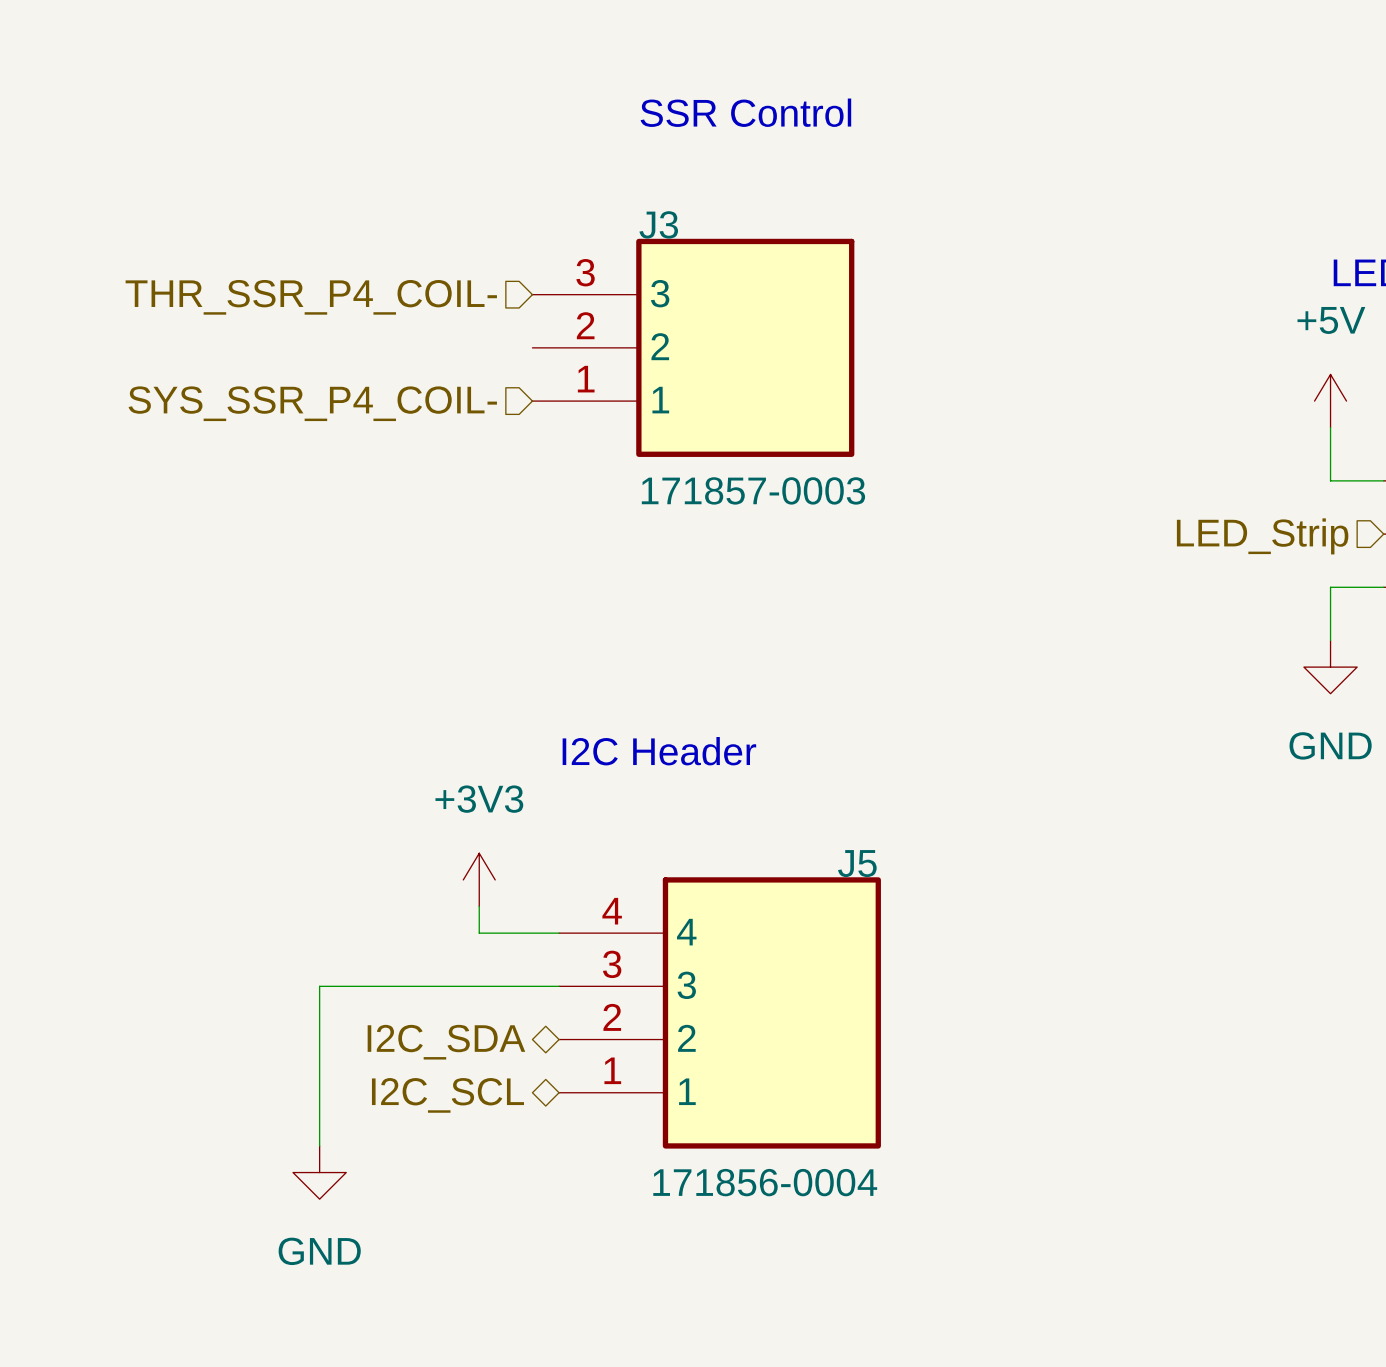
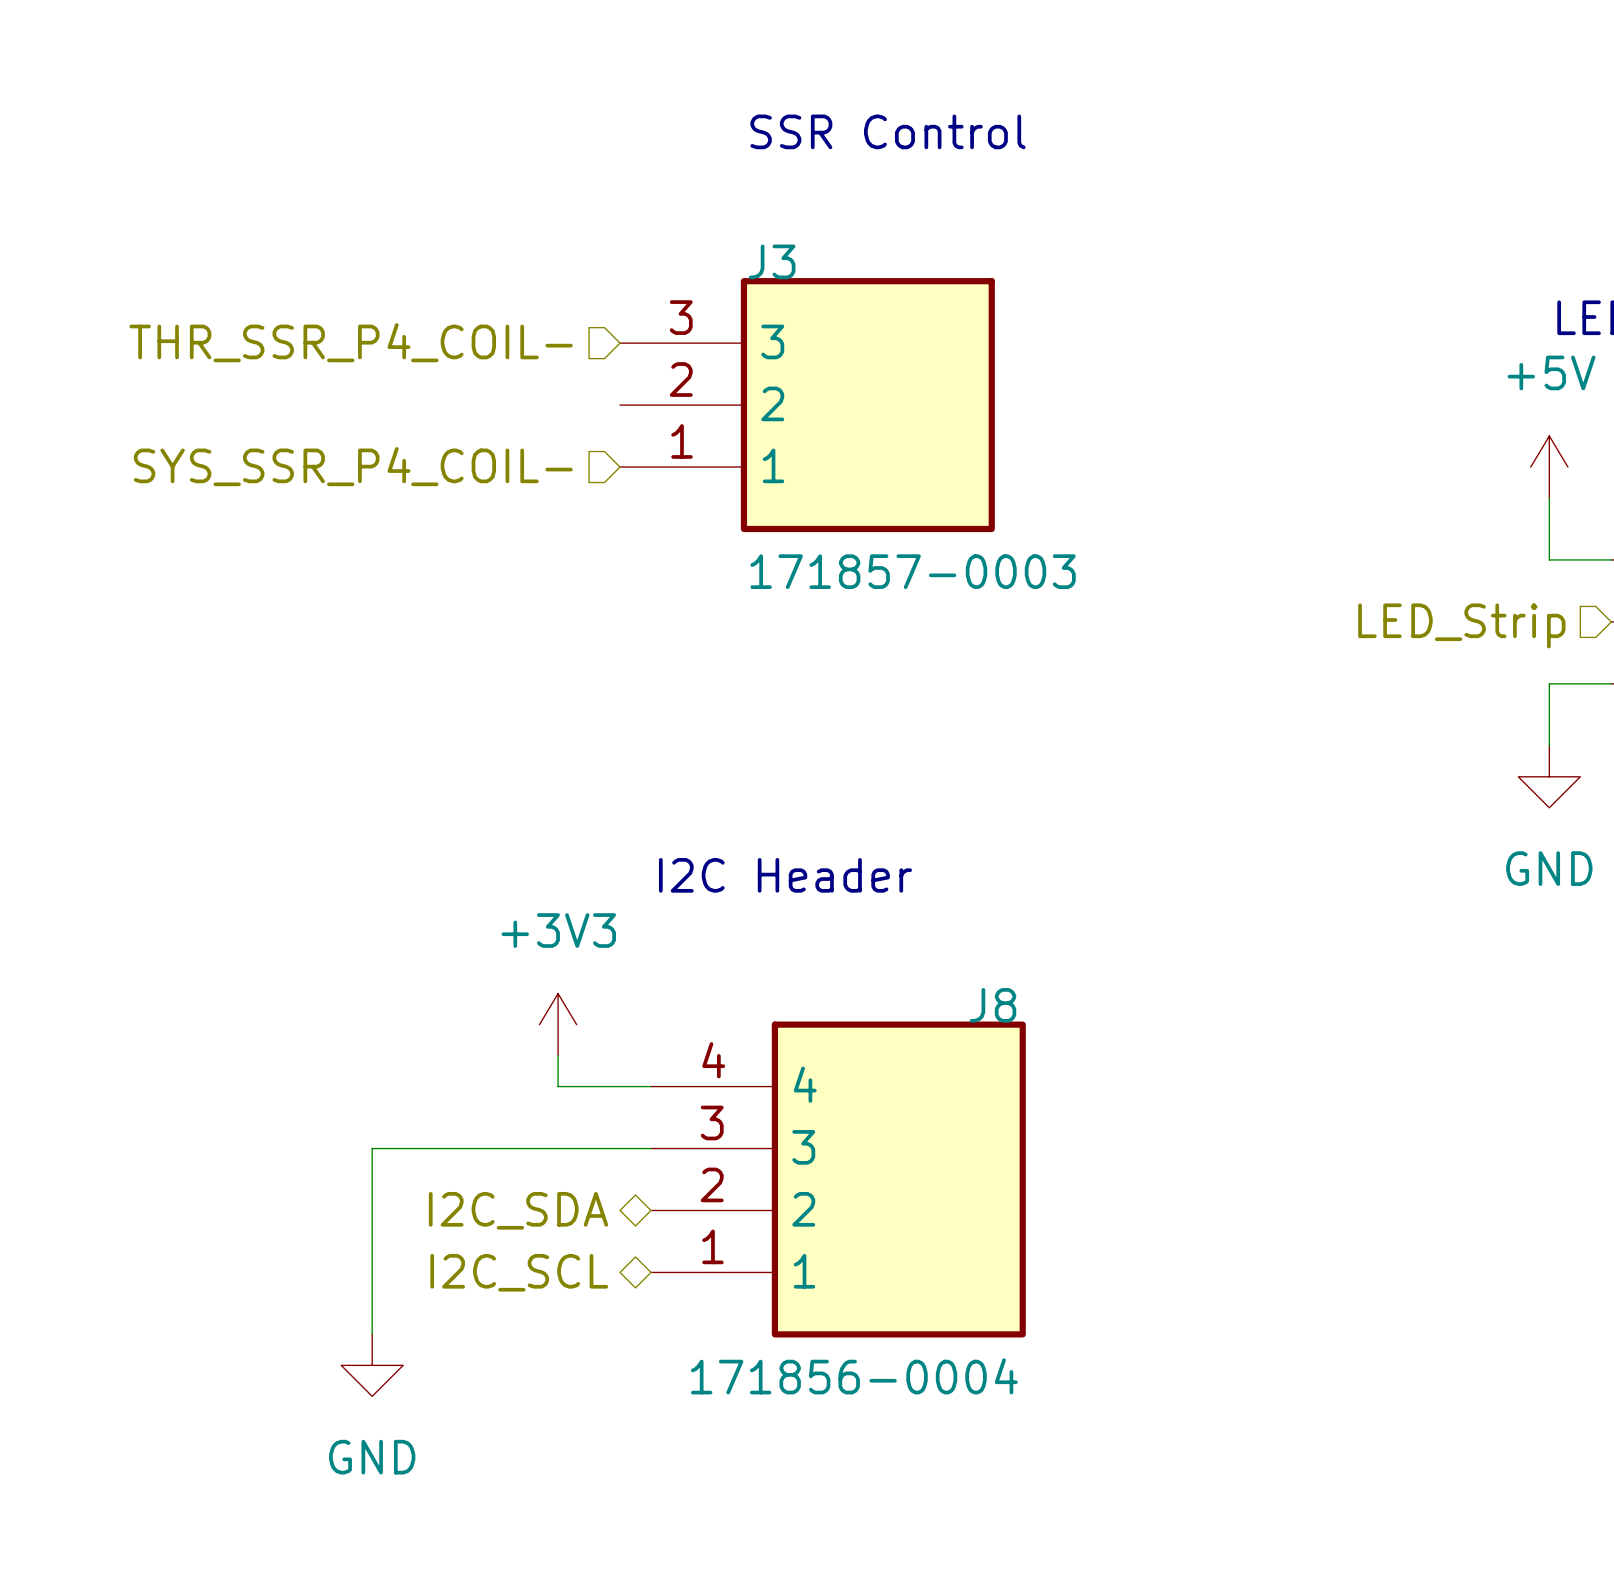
J5 name: J5 (857, 863) -> J8 (992, 1005)

